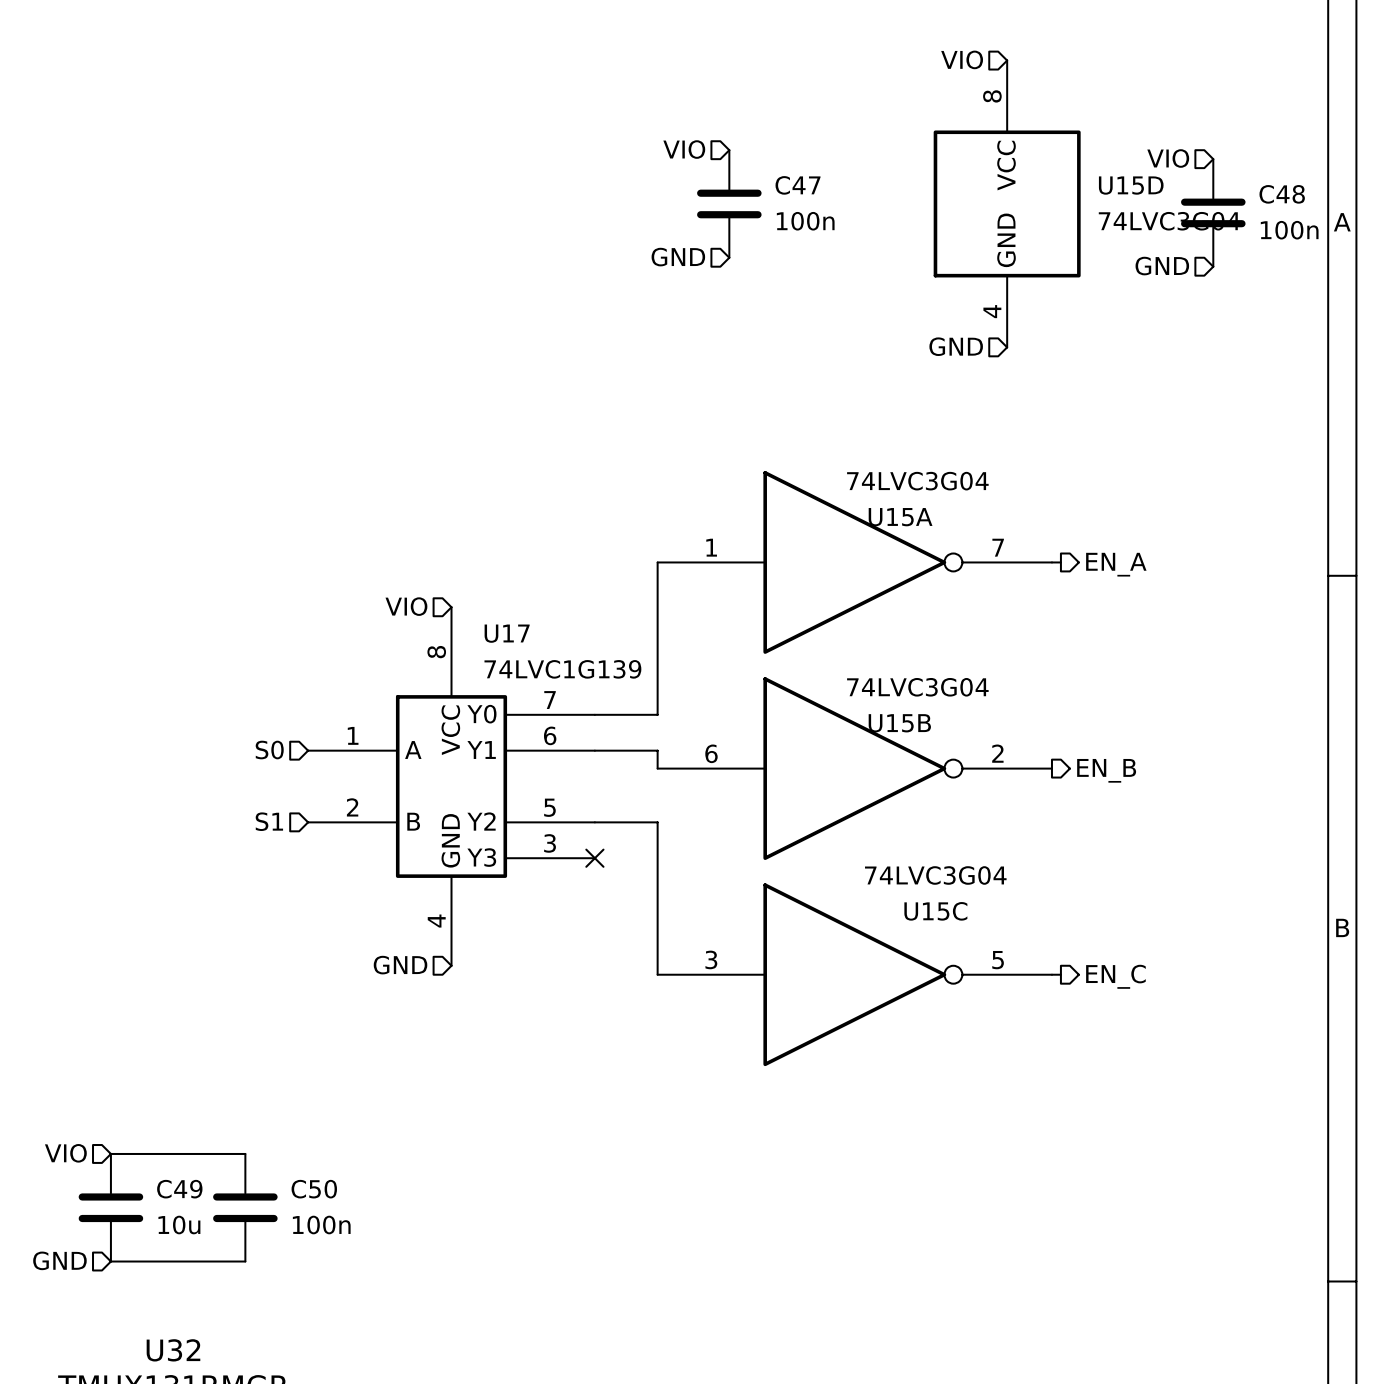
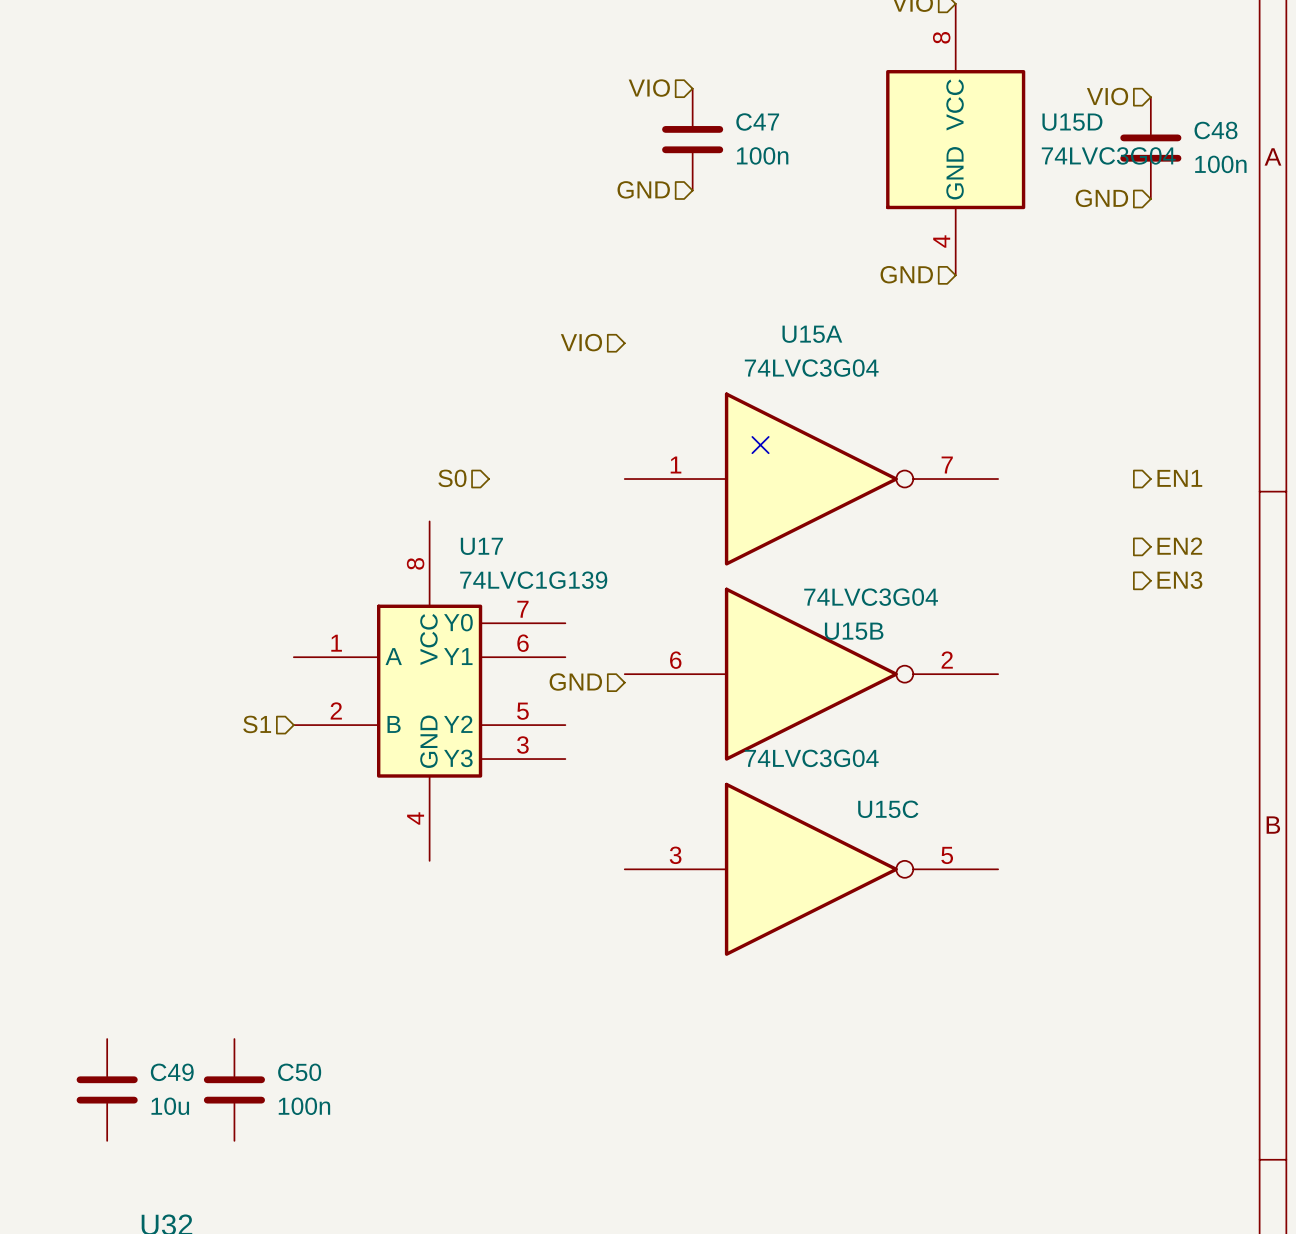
U15A value position: 74LVC3G04 (917, 481) -> 74LVC3G04 (811, 368)
U15A name position: U15A (900, 517) -> U15A (812, 334)
no-connect mark: none -> (760, 445)
hierarchical label: none -> EN1 (1179, 478)
wire: (657, 562) (657, 714) (594, 714) -> none
wire: (1051, 562) (1060, 562) -> none
hierarchical label: EN_A (1116, 564) -> none
hierarchical label position: VIO (406, 606) -> VIO (581, 342)
hierarchical label: none -> EN2 (1179, 546)
hierarchical label: none -> EN3 (1179, 580)
hierarchical label position: S0 (269, 750) -> S0 (452, 478)
wire: (594, 750) (657, 750) (657, 768) -> none
hierarchical label: EN_B (1106, 770) -> none
wire: (594, 822) (657, 822) (657, 974) -> none
no-connect mark: (594, 858) -> none
U15C value position: 74LVC3G04 (935, 875) -> 74LVC3G04 (811, 758)
hierarchical label position: GND (400, 965) -> GND (575, 682)
wire: (1051, 974) (1060, 974) -> none
hierarchical label: EN_C (1115, 976) -> none
hierarchical label: VIO (65, 1153) -> none
wire: (110, 1153) (245, 1153) -> none
hierarchical label: GND (59, 1260) -> none
wire: (110, 1261) (245, 1261) -> none

